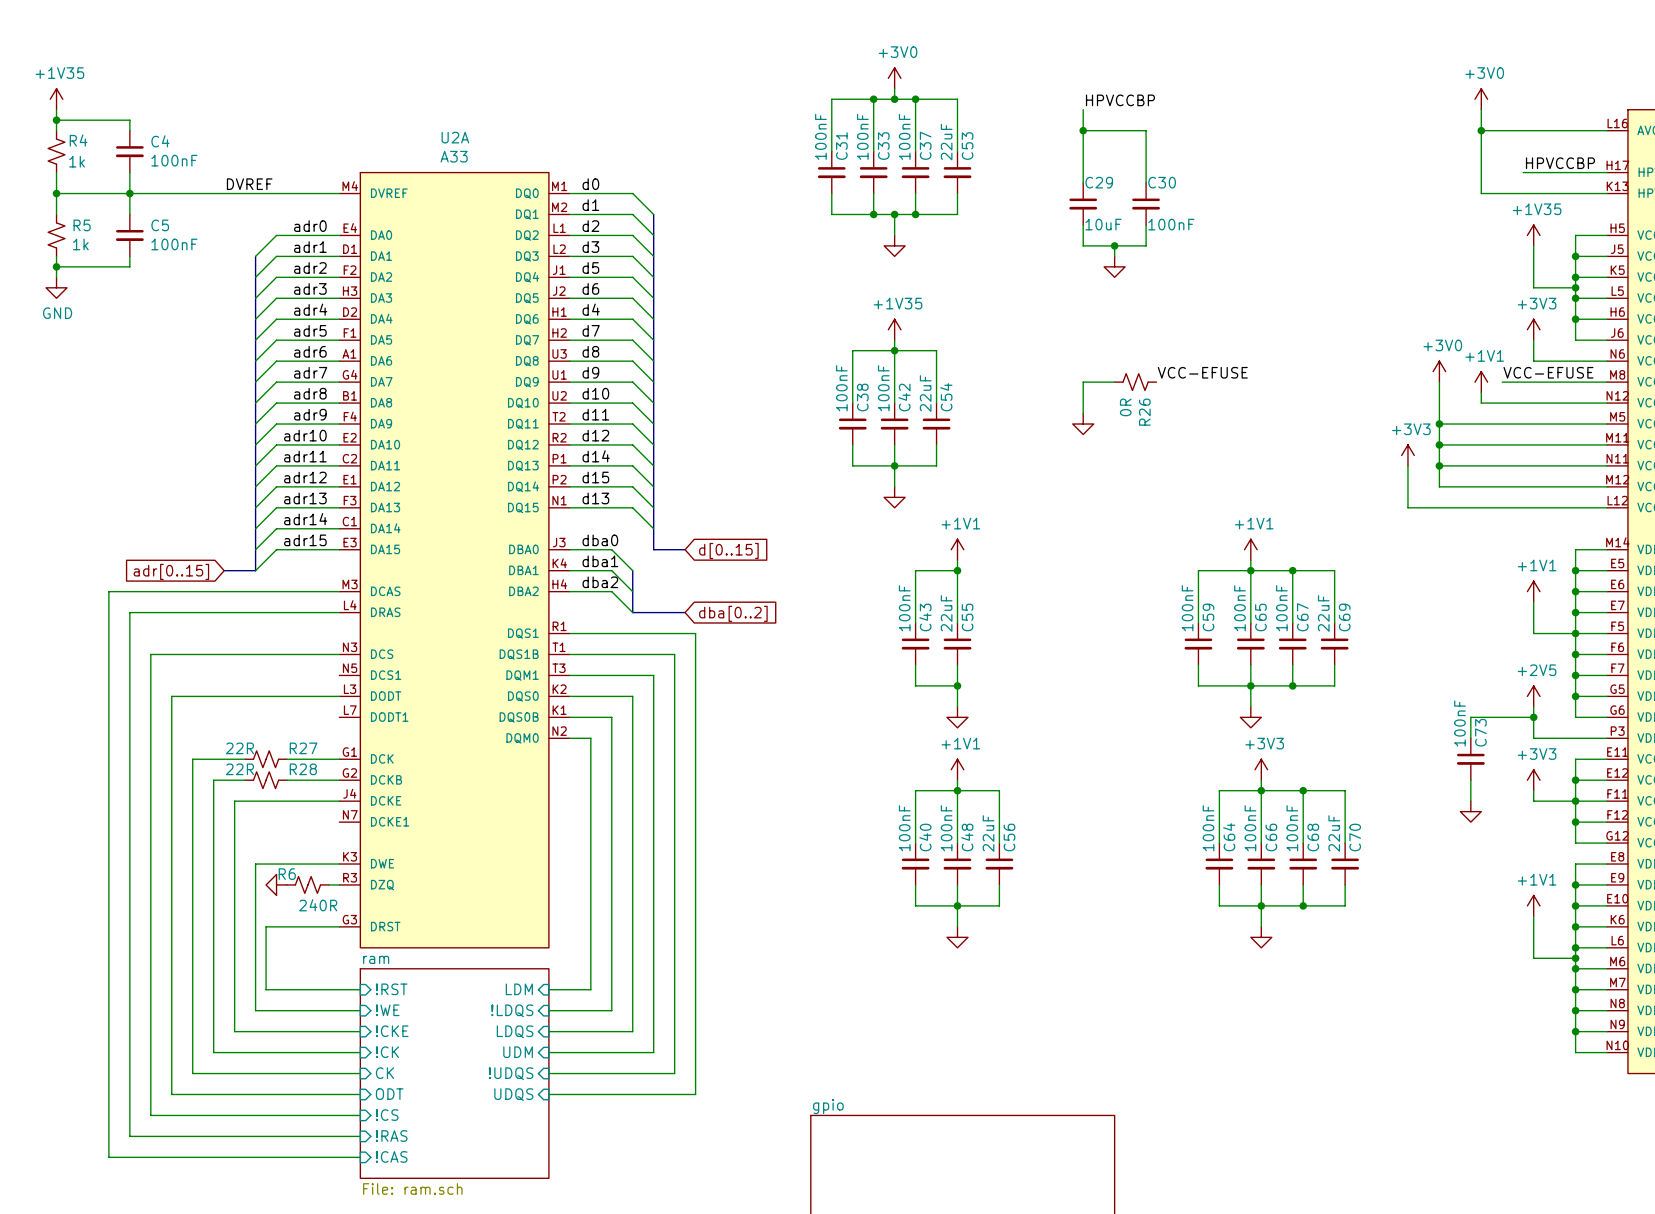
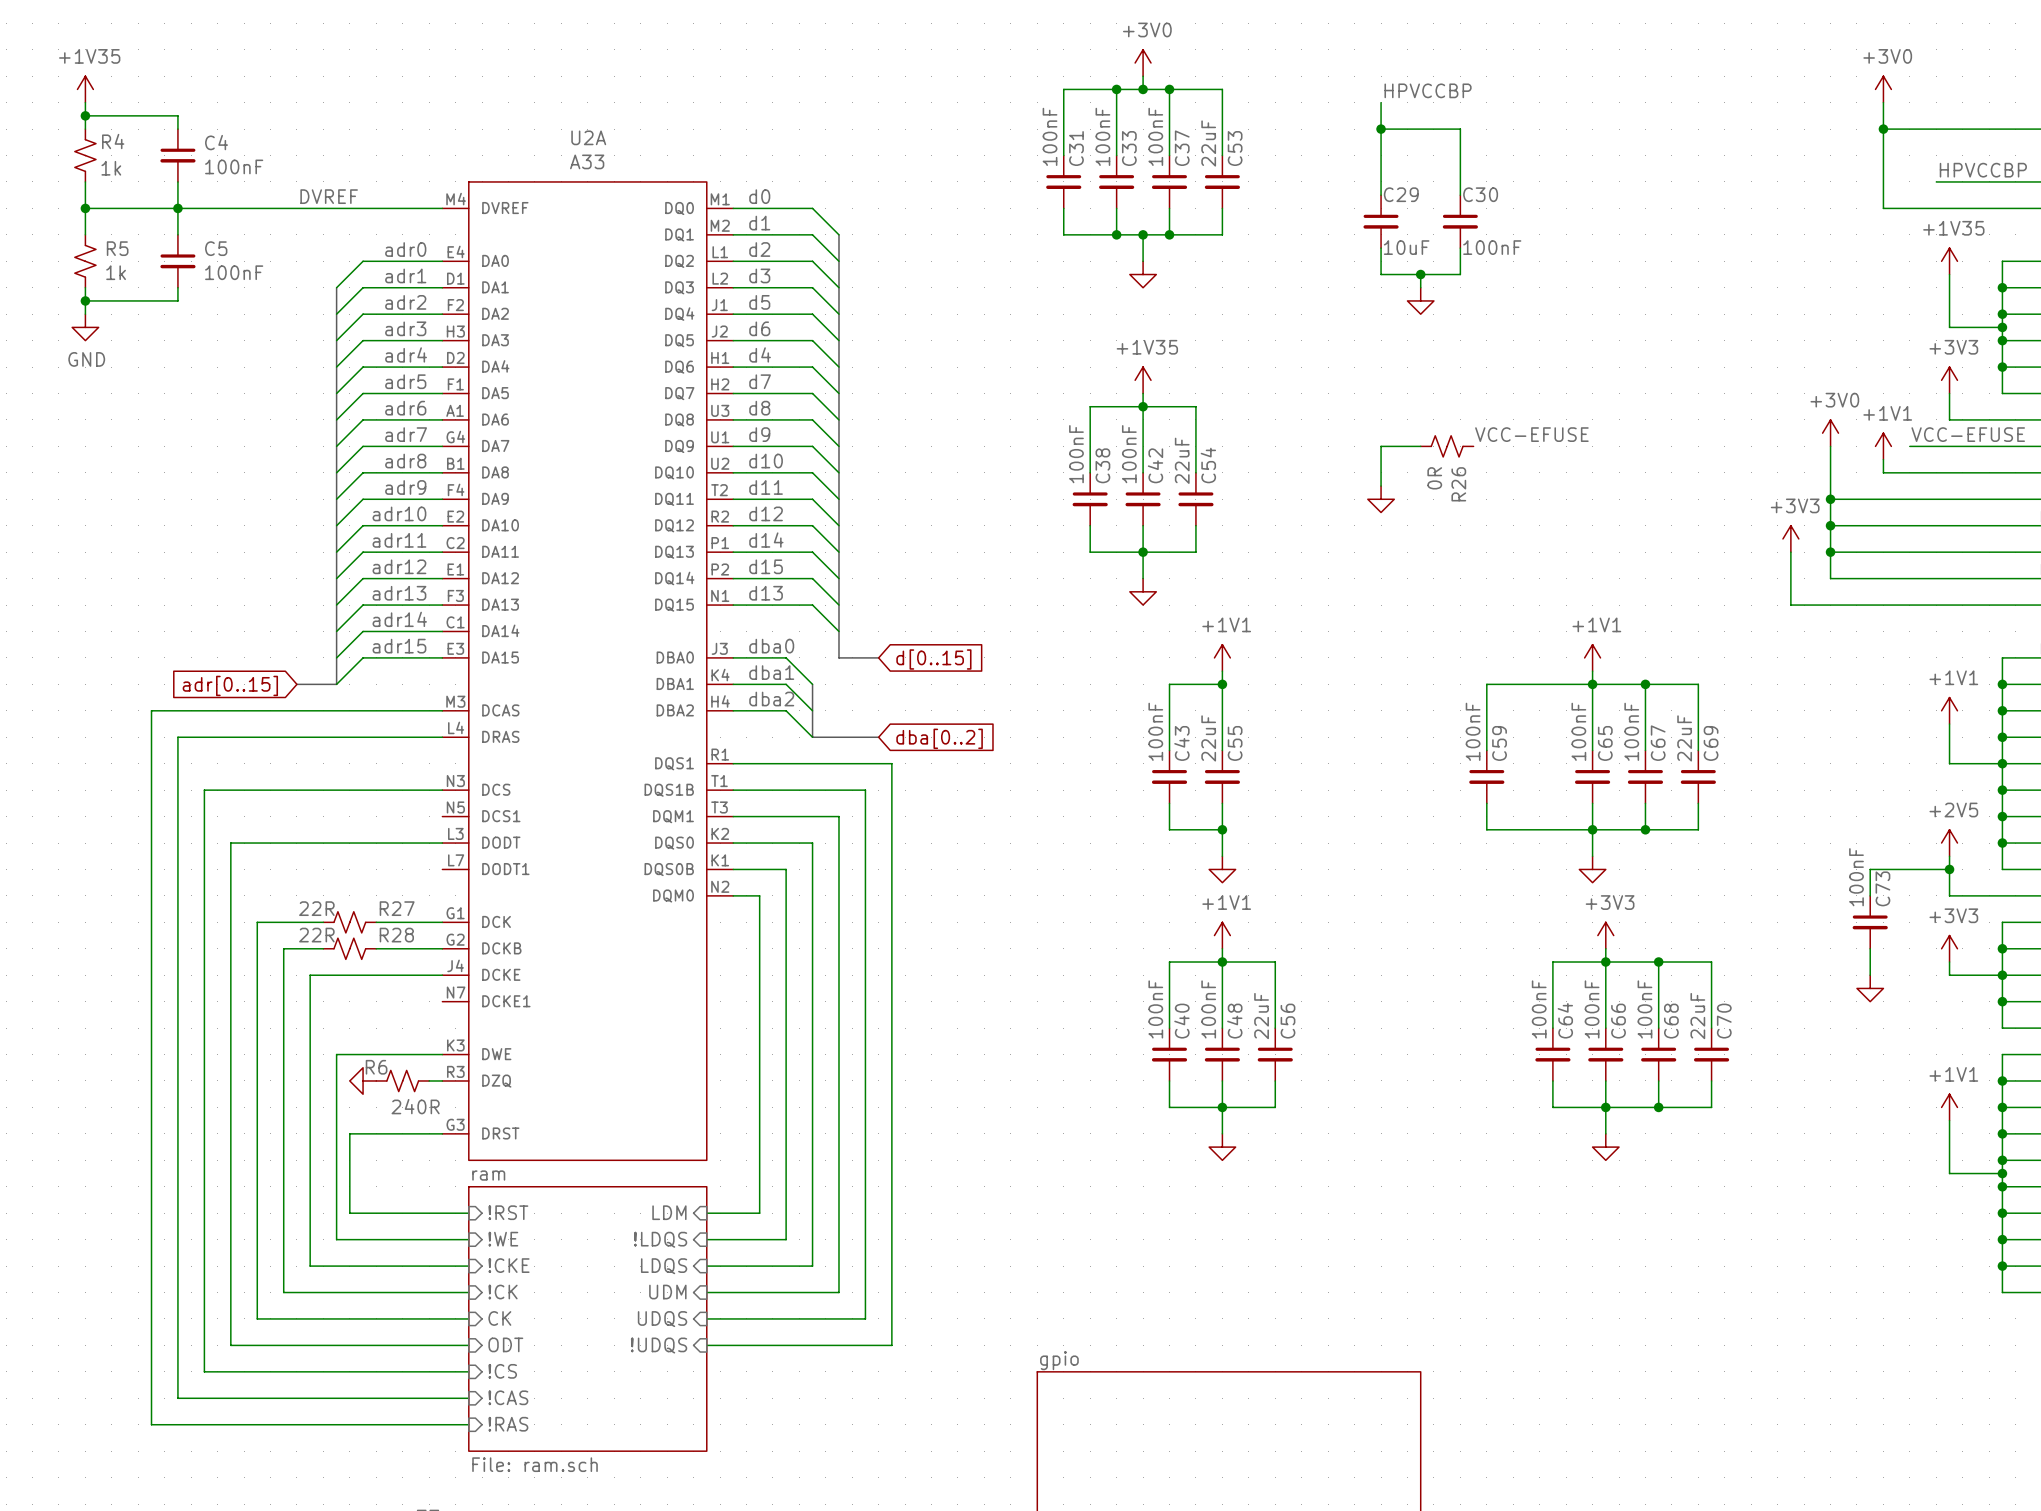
wire: (1198, 570) (1198, 623) -> (1526, 684) (1486, 684) (1486, 750)
C59 position: (1198, 644) -> (1486, 776)
wire: (1198, 664) (1198, 685) -> (1486, 803) (1486, 829) (1526, 829)
sheet pin: !UDQS (511, 1073) -> UDQS (662, 1319)
sheet pin: UDQS (513, 1094) -> !UDQS (659, 1345)
sheet pin: !RAS (391, 1136) -> !CAS (508, 1397)
sheet pin: !CAS (391, 1156) -> !RAS (508, 1424)

